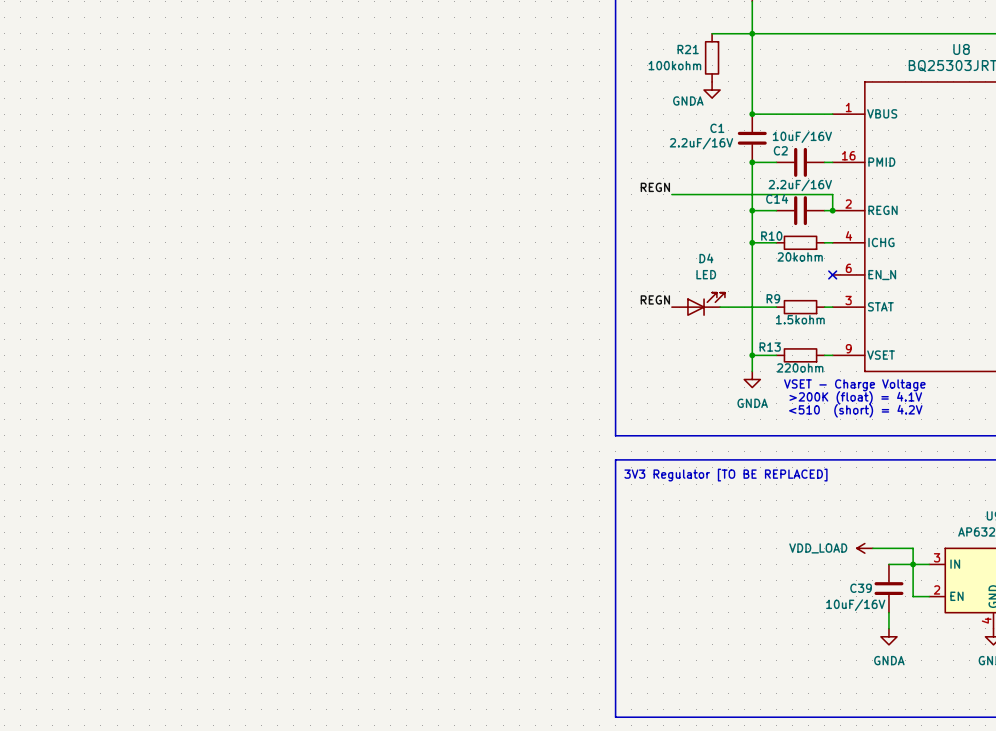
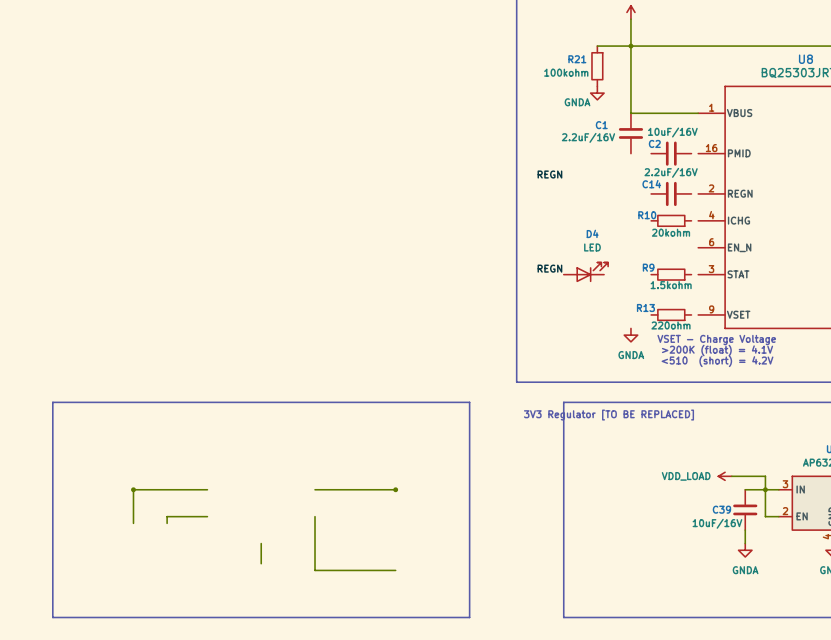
junction: (752, 114) -> none
junction: (752, 162) -> none
wire: (776, 162) (752, 162) (752, 371) -> none
wire: (824, 162) (832, 162) -> none
wire: (671, 194) (832, 194) (832, 210) (824, 210) -> none
wire: (752, 210) (776, 210) -> none
junction: (752, 210) -> none
junction: (832, 210) -> none
wire: (752, 242) (776, 242) -> none
junction: (752, 242) -> none
wire: (824, 242) (832, 242) -> none
no-connect mark: (832, 274) -> none
wire: (720, 307) (776, 307) -> none
wire: (824, 307) (832, 307) -> none
wire: (752, 355) (776, 355) -> none
junction: (752, 355) -> none
wire: (824, 355) (832, 355) -> none
line: none -> (52, 402) (469, 402) (469, 617) (52, 617) (52, 402)
line: (671, 459) (615, 459) (615, 717) (671, 717) -> (563, 402) (563, 617)
junction: none -> (133, 489)
wire: none -> (207, 489) (133, 489) (133, 523)
wire: none -> (315, 489) (395, 489)
junction: none -> (395, 489)
wire: none -> (207, 516) (167, 516) (167, 523)
wire: none -> (315, 516) (315, 570) (395, 570)
wire: none -> (261, 543) (261, 563)

